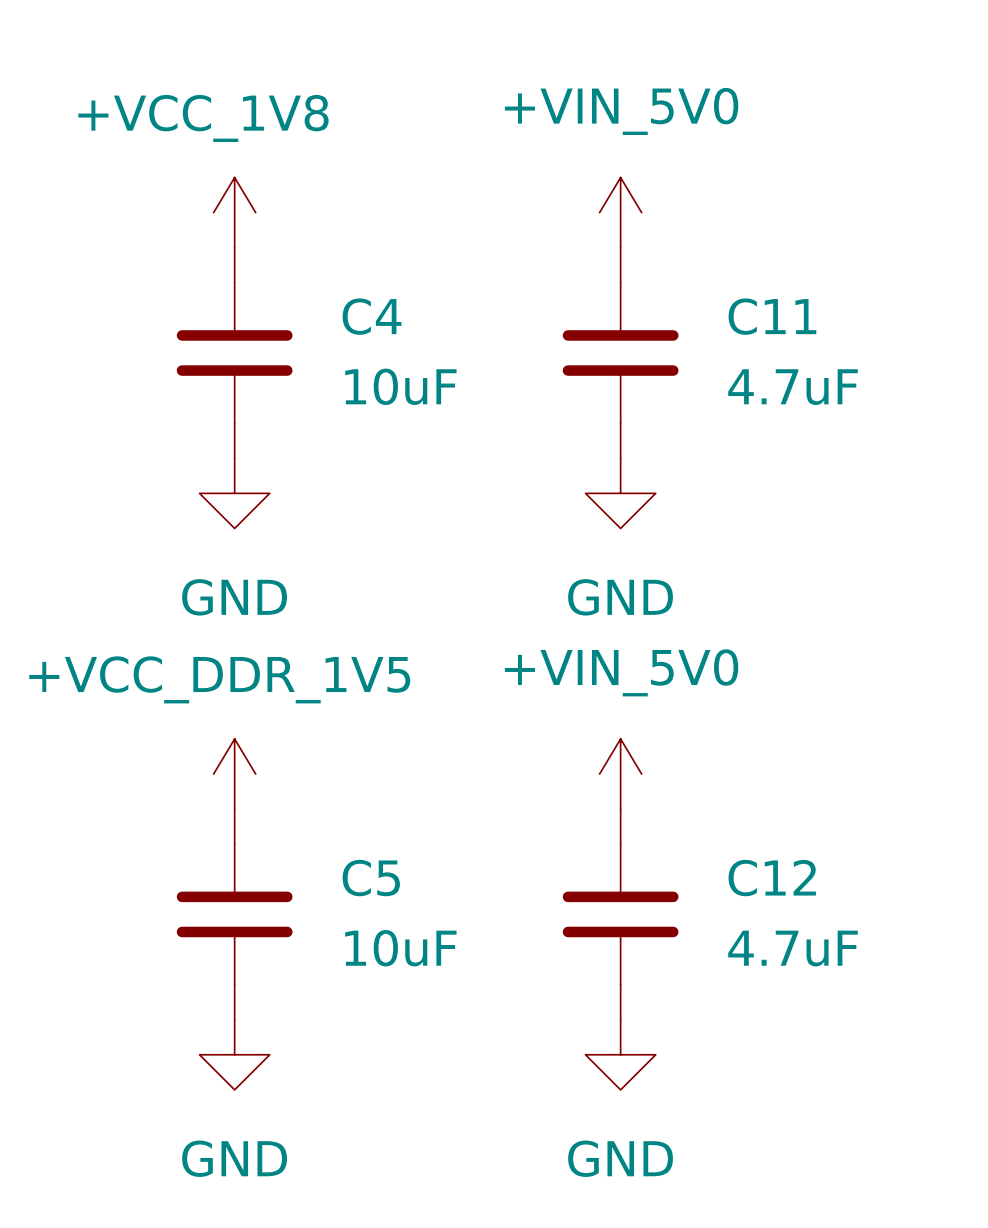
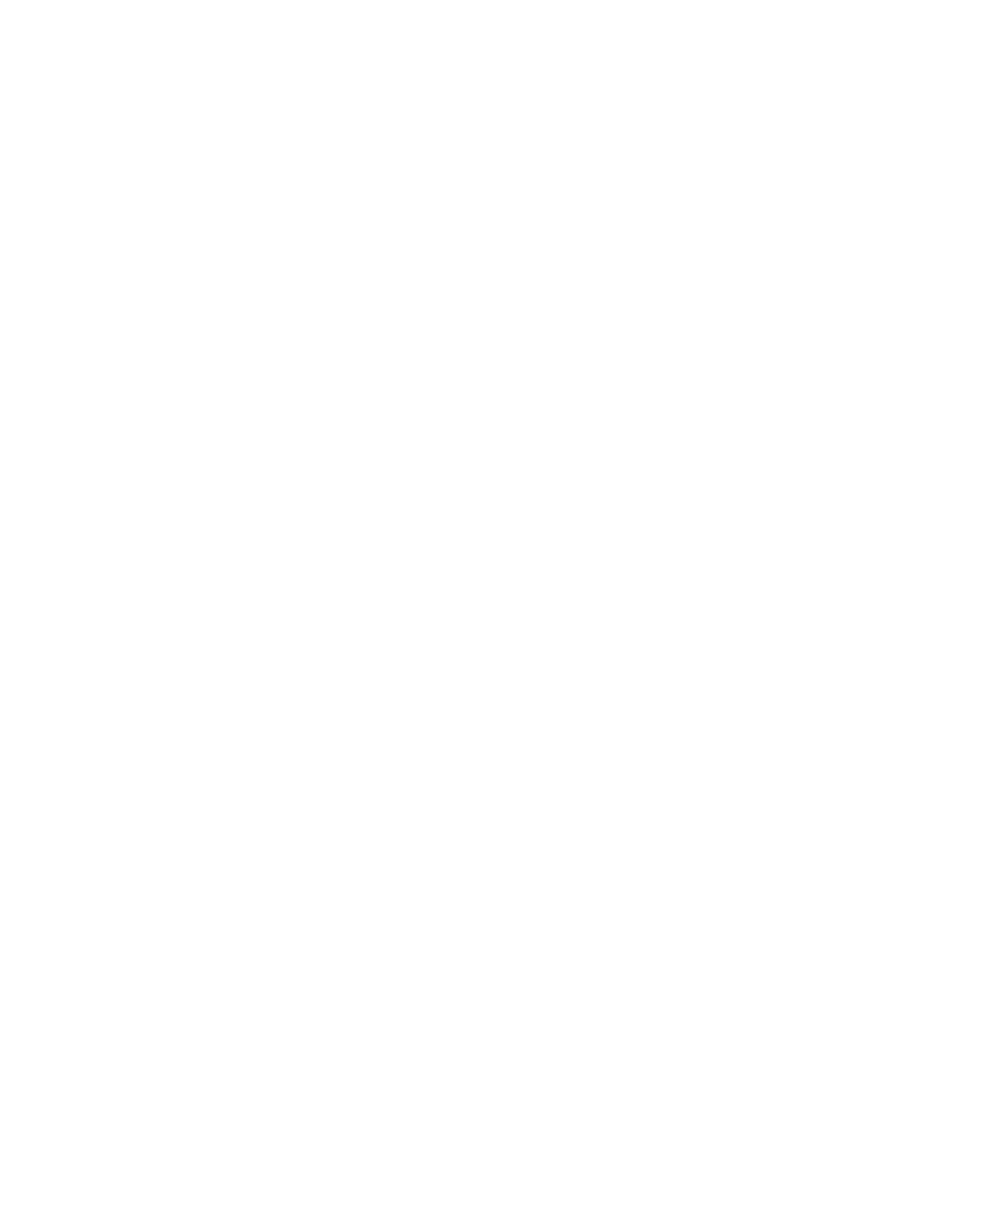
power symbol: +VCC_1V8 (234, 212) -> none
power symbol: +VIN_5V0 (620, 212) -> none
C4: (234, 353) -> none
C11: (620, 353) -> none
power symbol: GND (234, 493) -> none
power symbol: GND (620, 493) -> none
power symbol: +VCC_DDR_1V5 (234, 774) -> none
power symbol: +VIN_5V0 (620, 774) -> none
C5: (234, 914) -> none
C12: (620, 914) -> none
power symbol: GND (234, 1054) -> none
power symbol: GND (620, 1054) -> none

